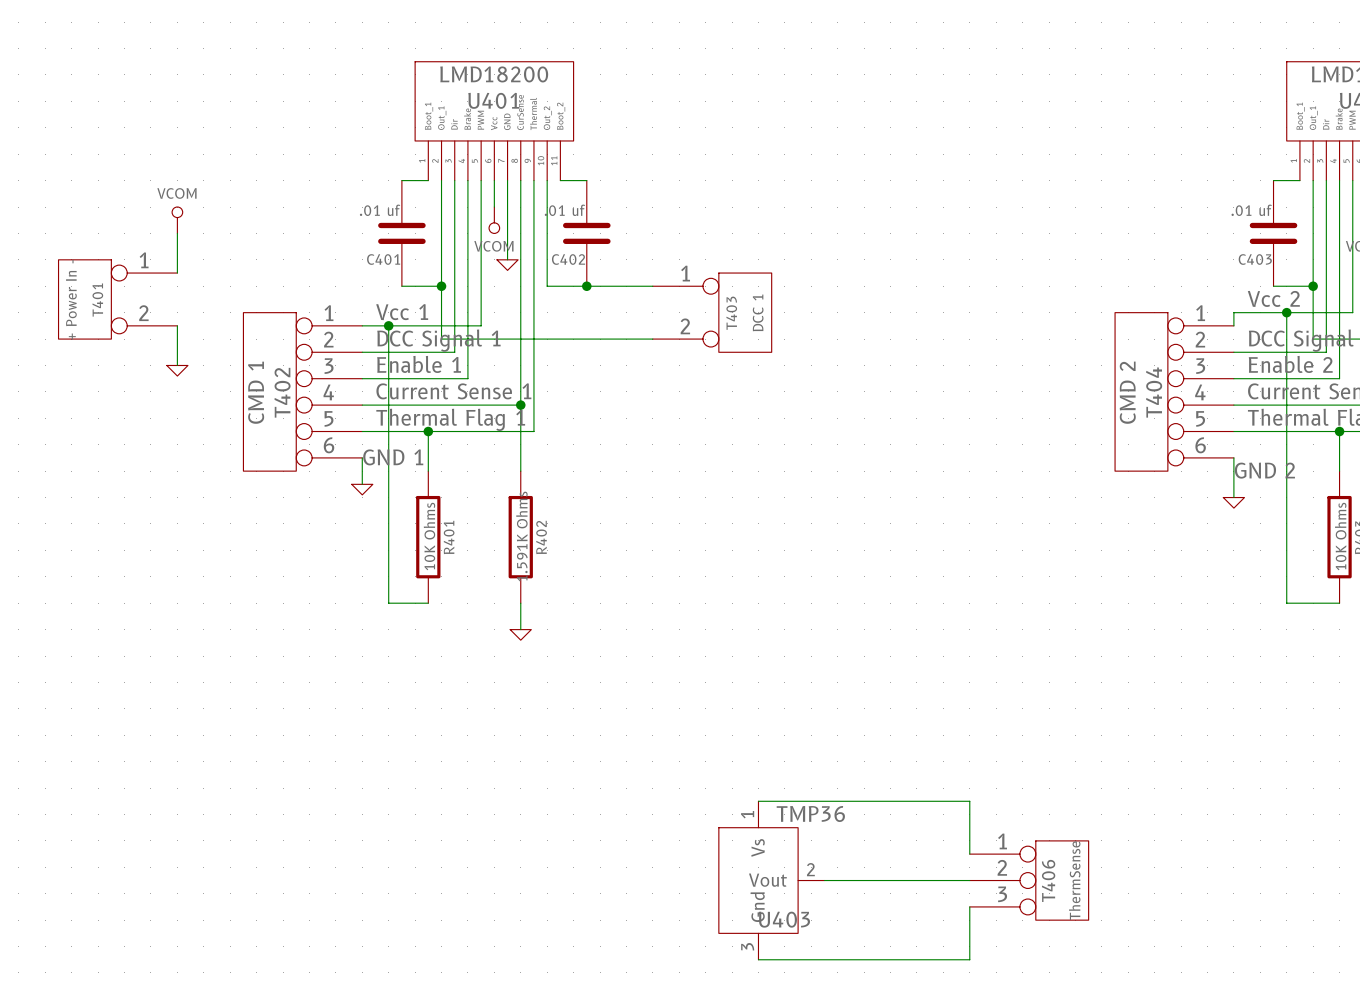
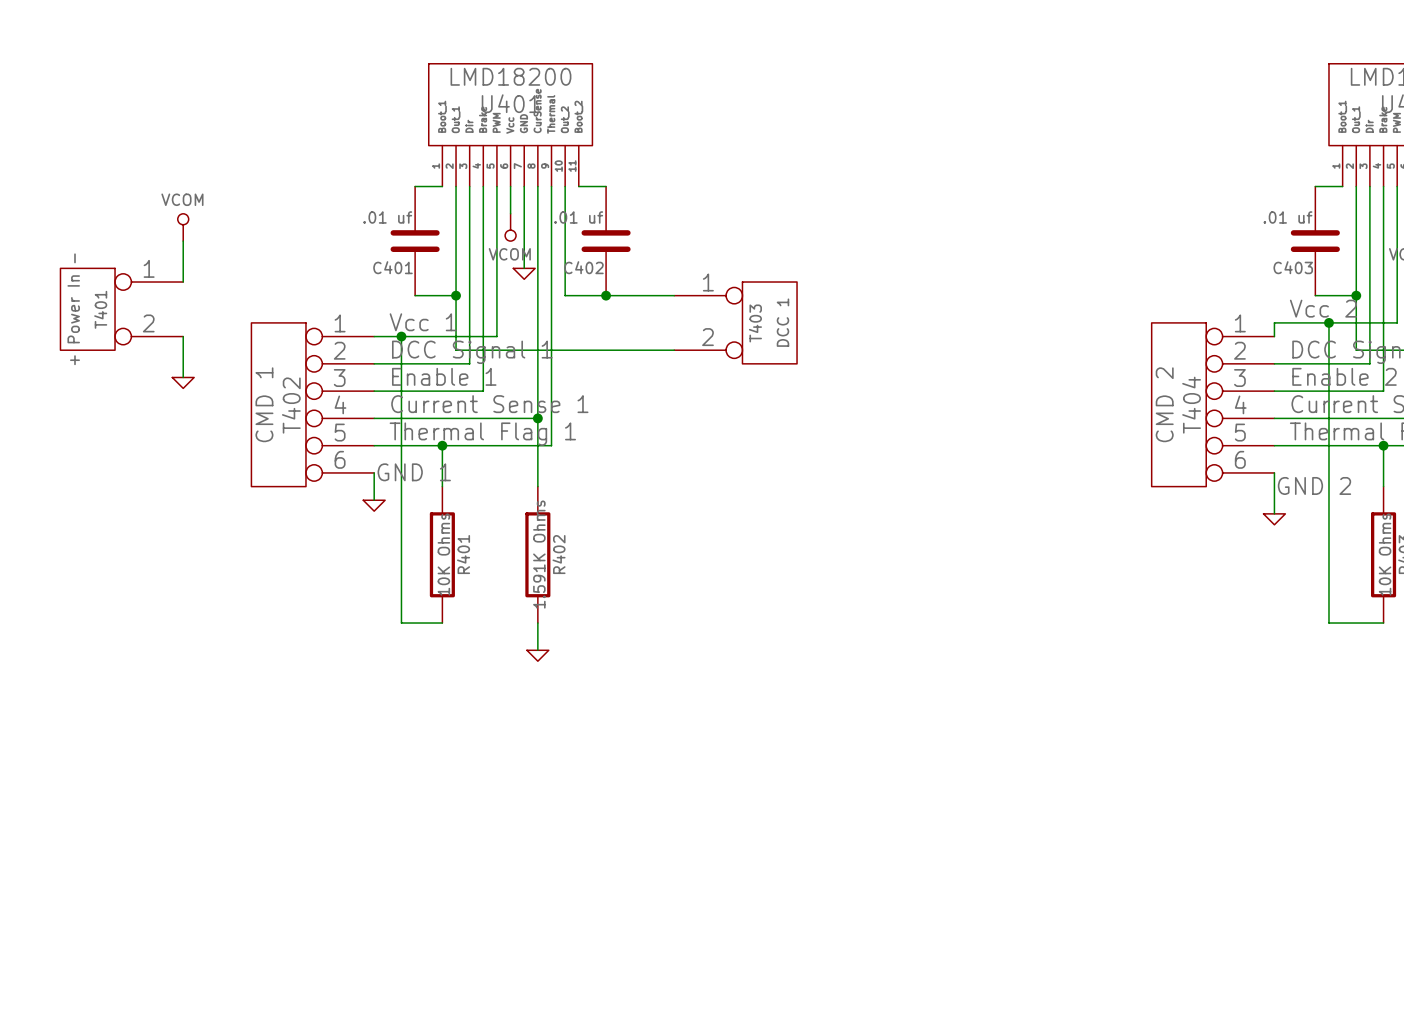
wire: (758, 801) (969, 801) (969, 854) -> none
U403: TMP36 (771, 880) -> none
wire: (824, 880) (969, 880) -> none
T406: ThermSense (1029, 880) -> none
wire: (969, 906) (969, 959) (758, 959) -> none

